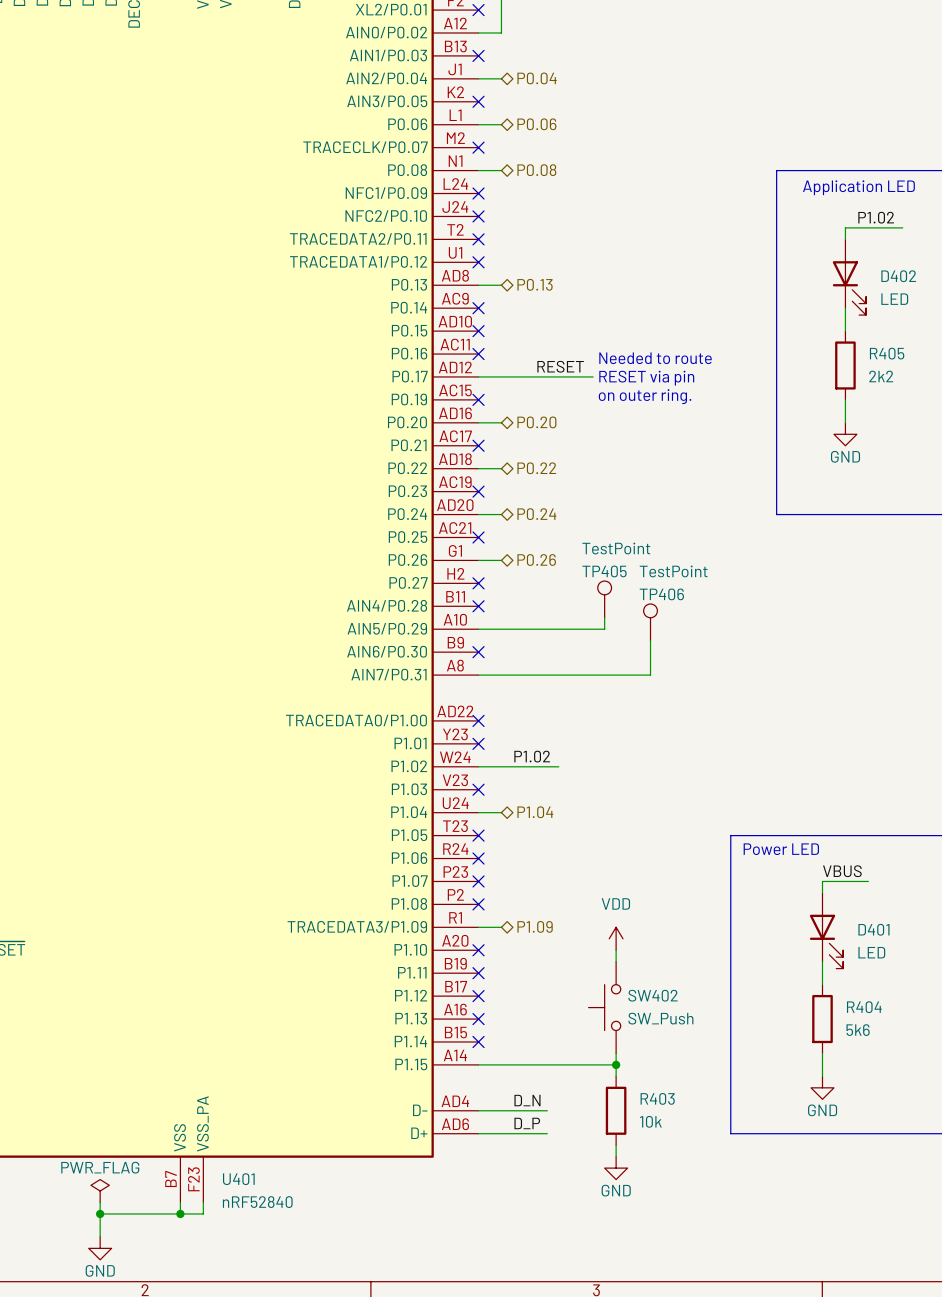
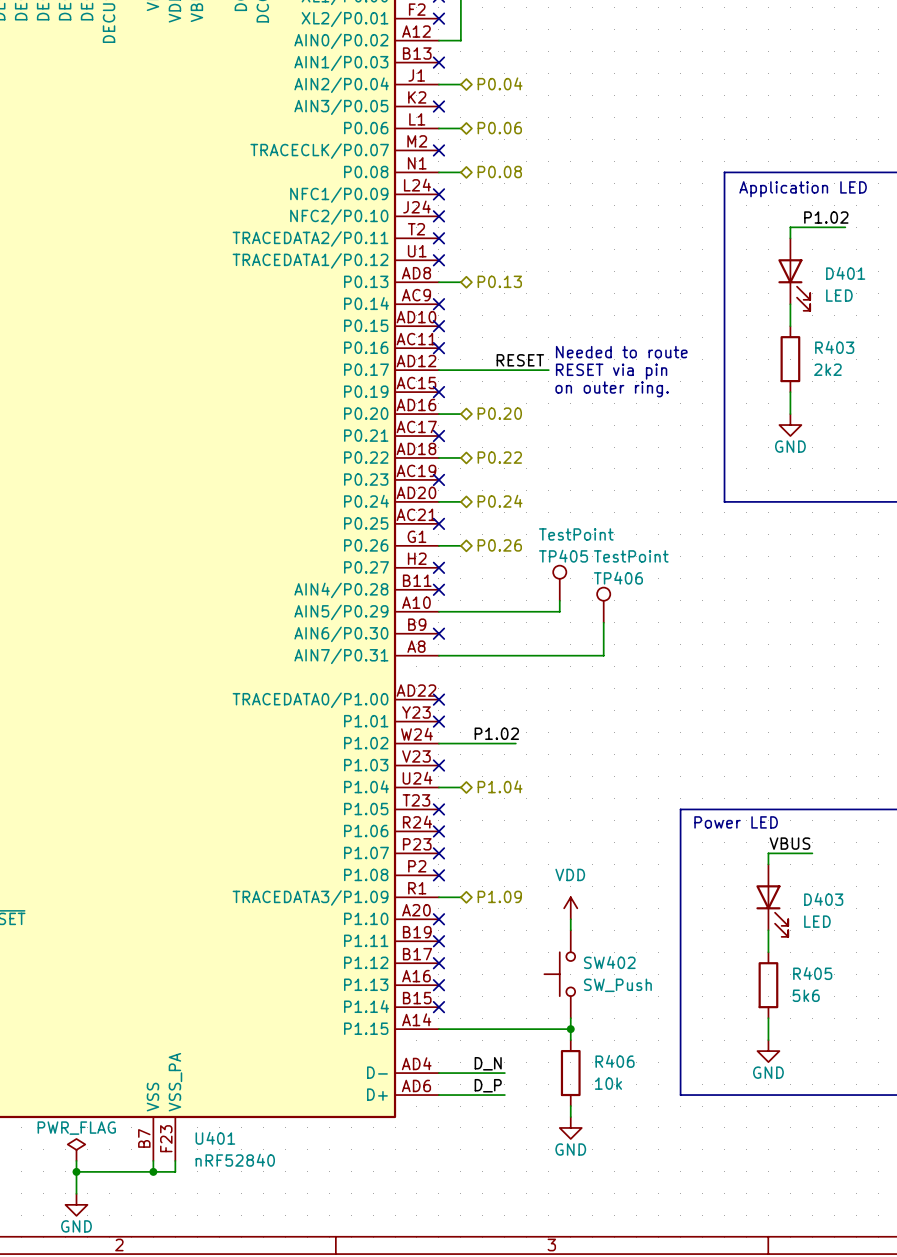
D402 name: D402 (898, 276) -> D401 (845, 273)
R405 name: R405 (887, 353) -> R403 (834, 347)
D401 name: D401 (873, 929) -> D403 (823, 899)
R404 name: R404 (864, 1007) -> R405 (812, 973)
R403 name: R403 (657, 1098) -> R406 (615, 1061)

